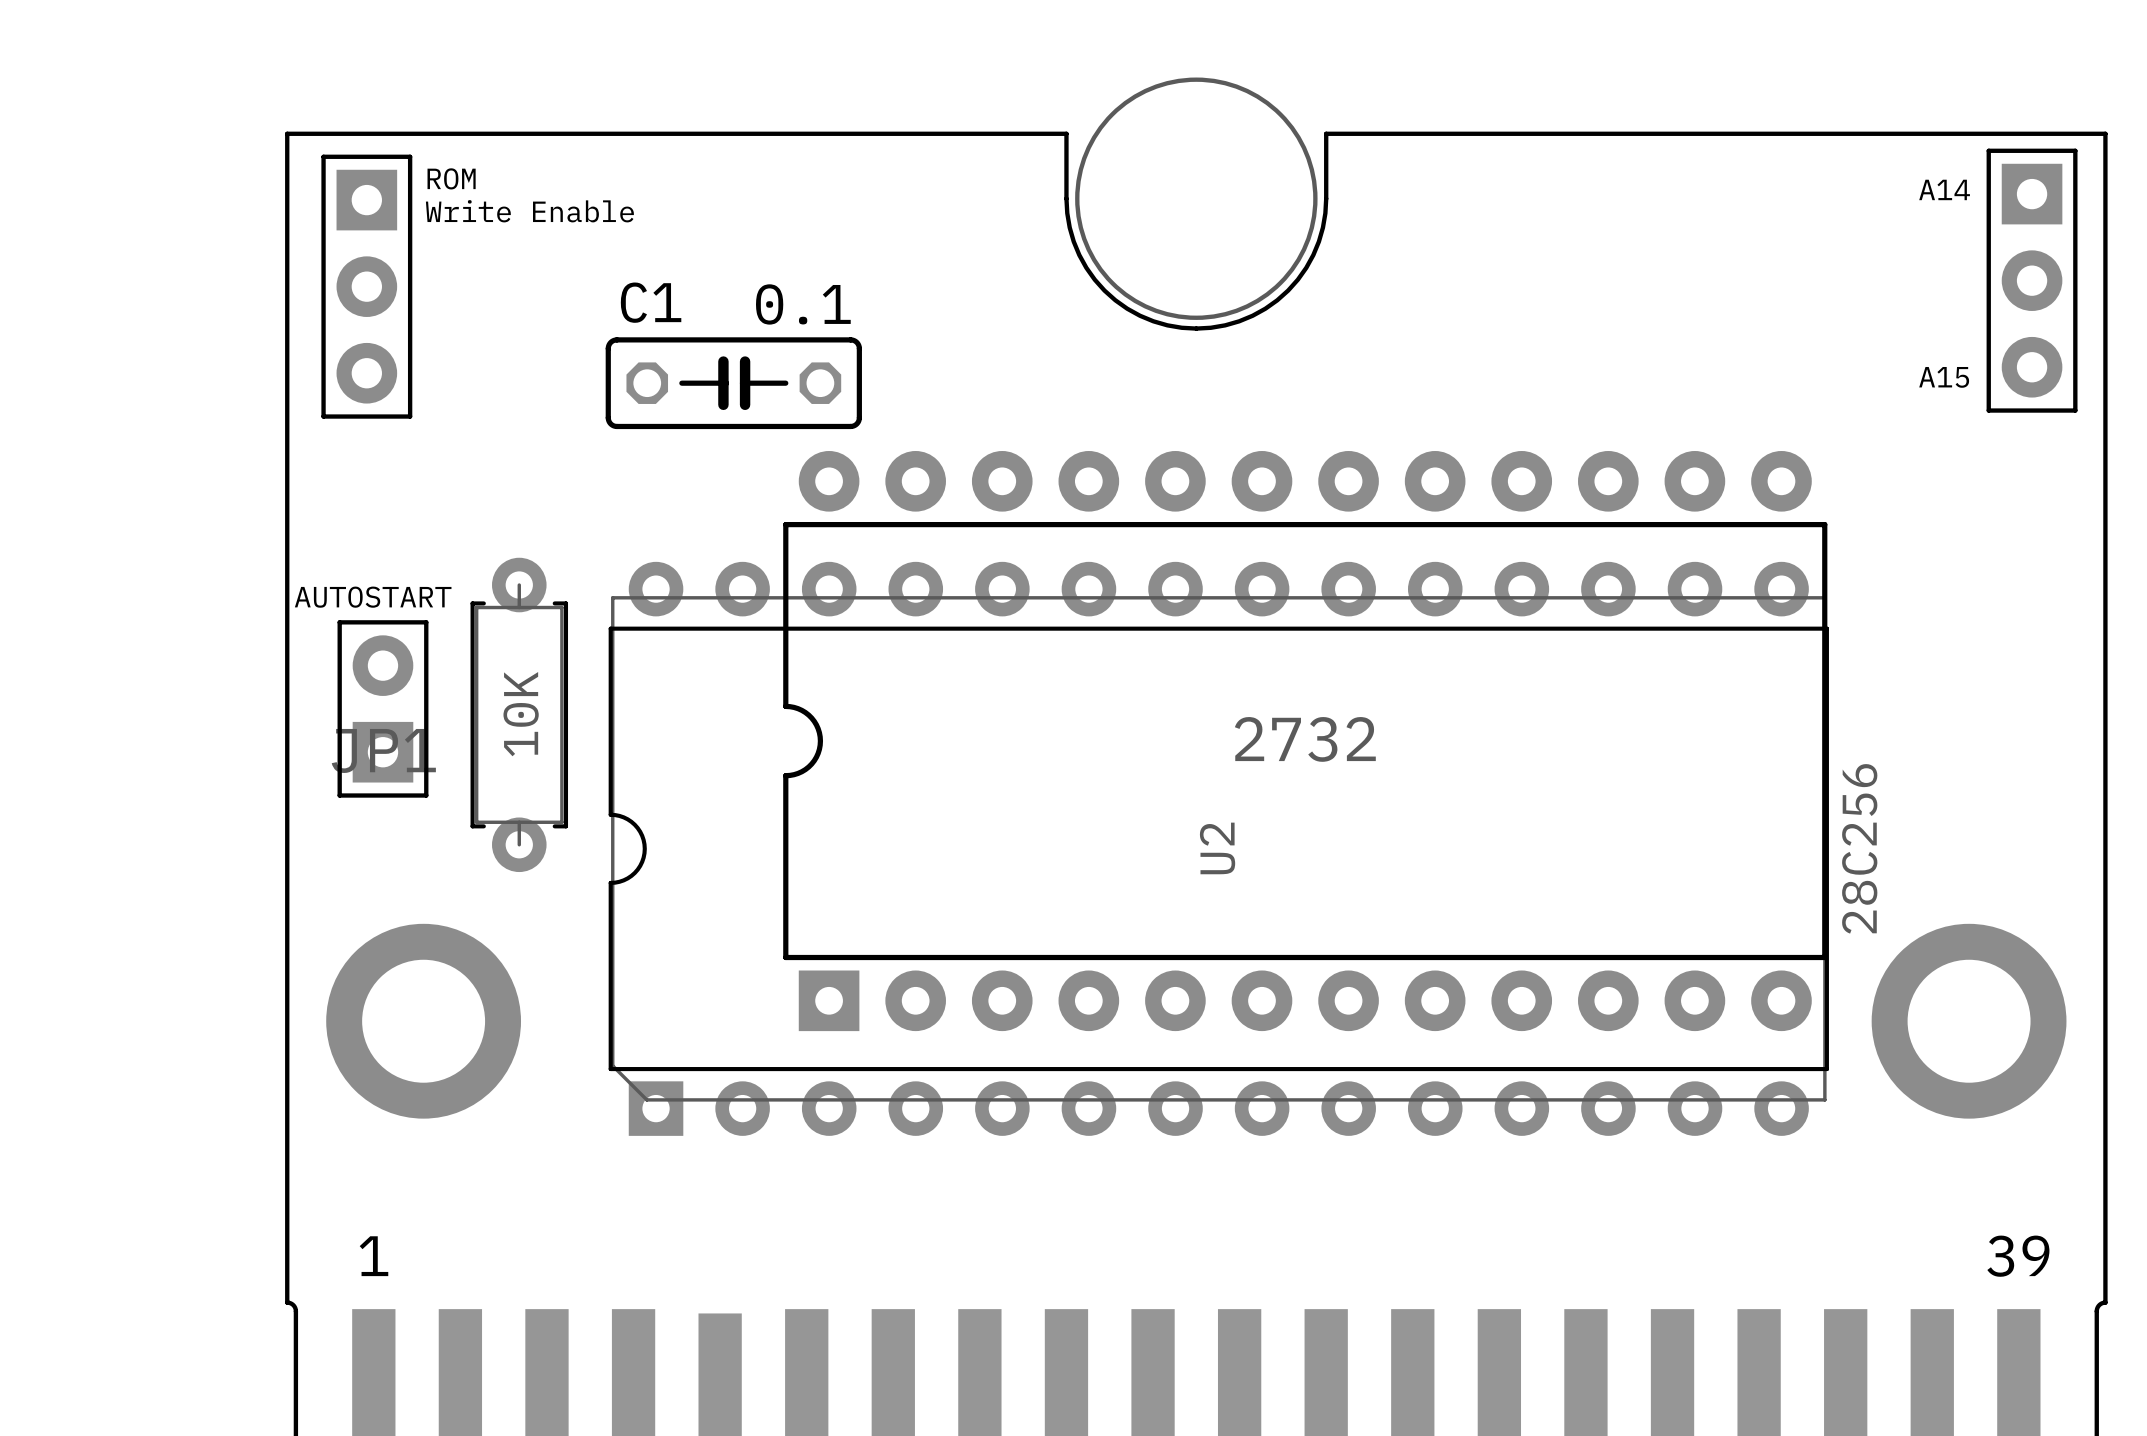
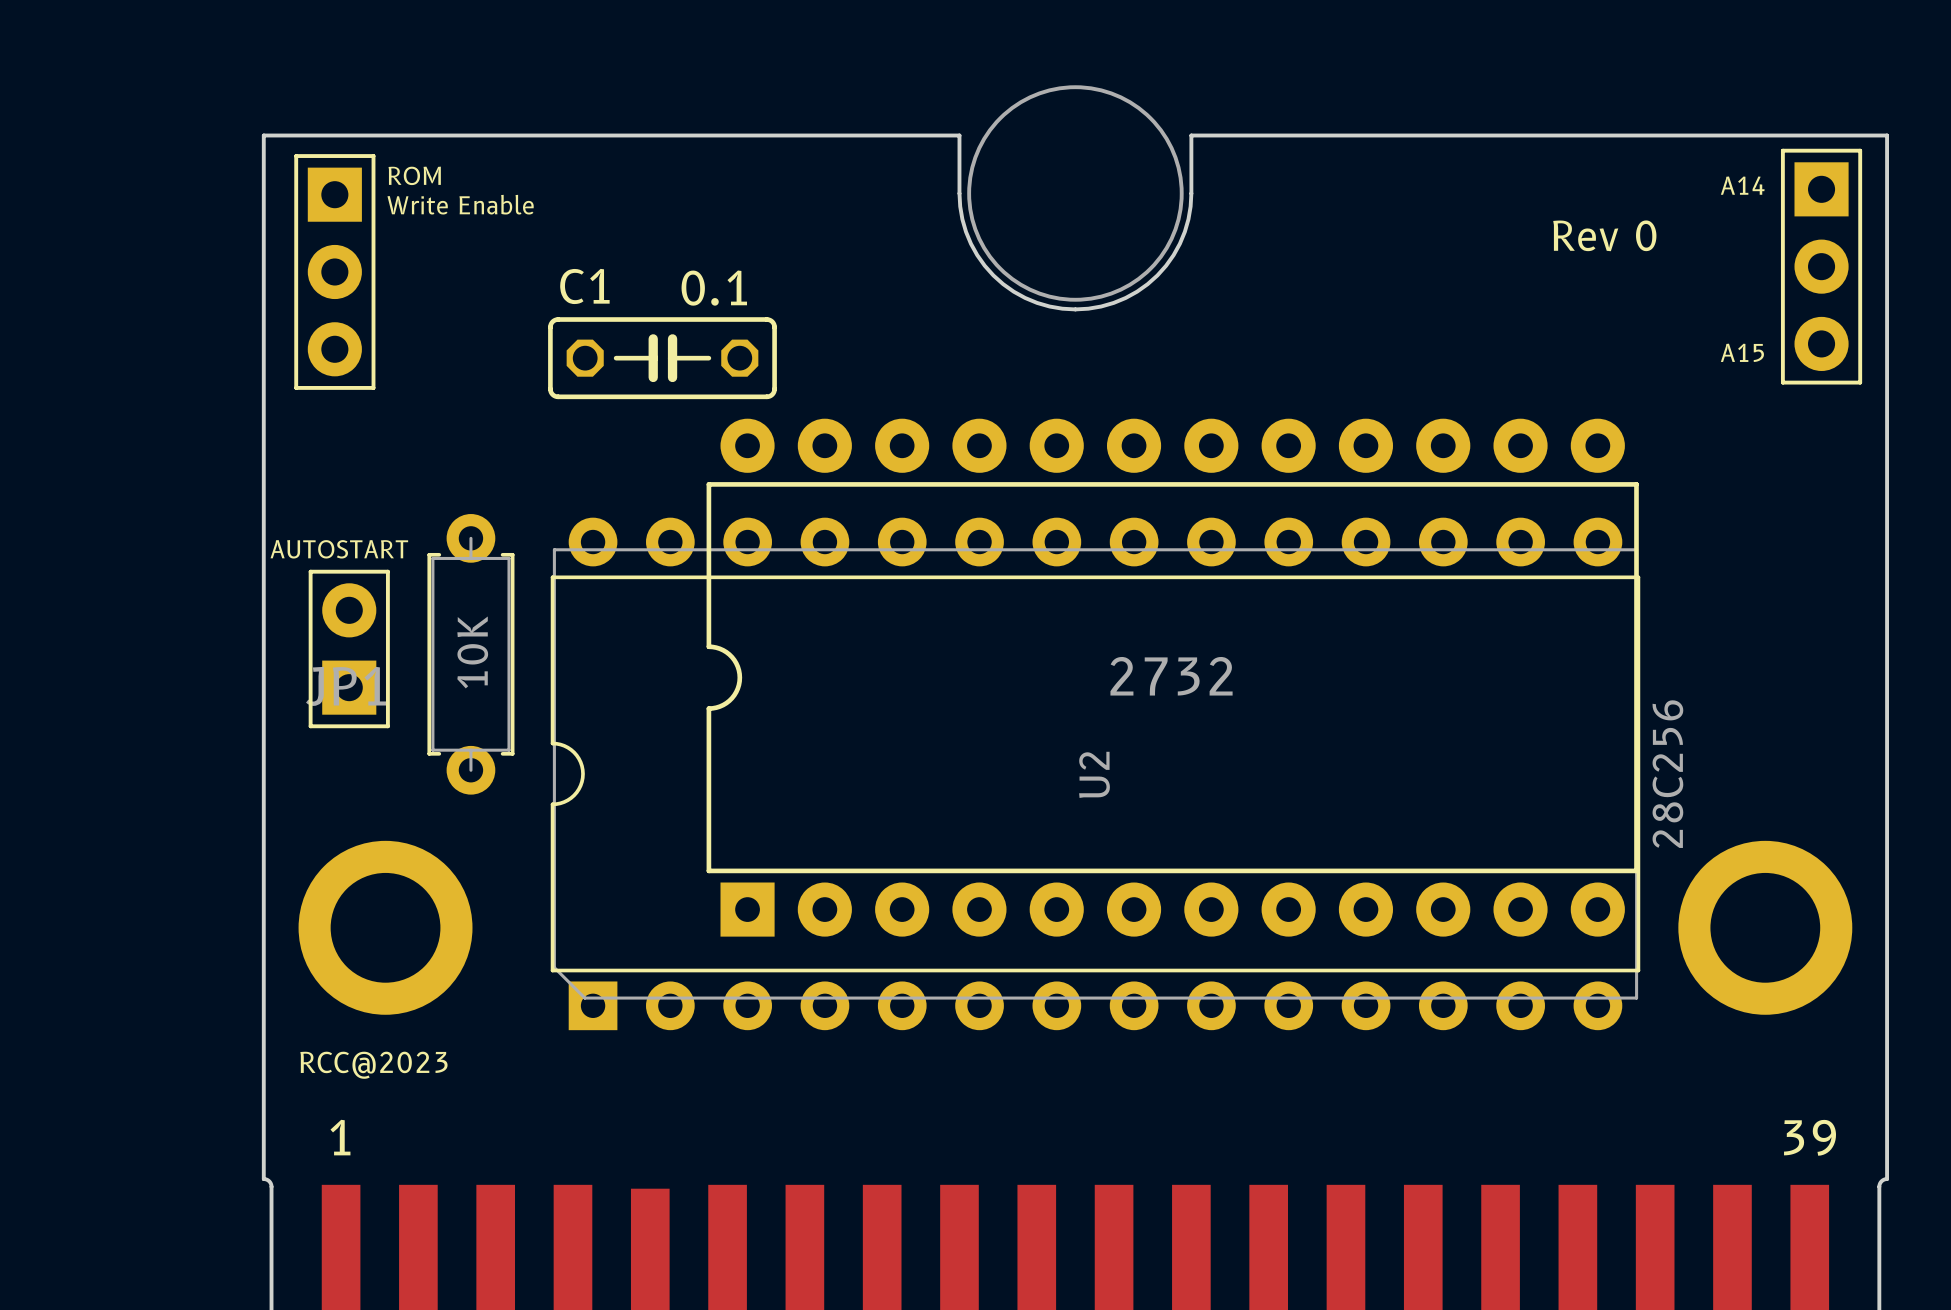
text: none -> Rev 0 (1604, 235)
text: none -> RCC@2023 (373, 1065)

